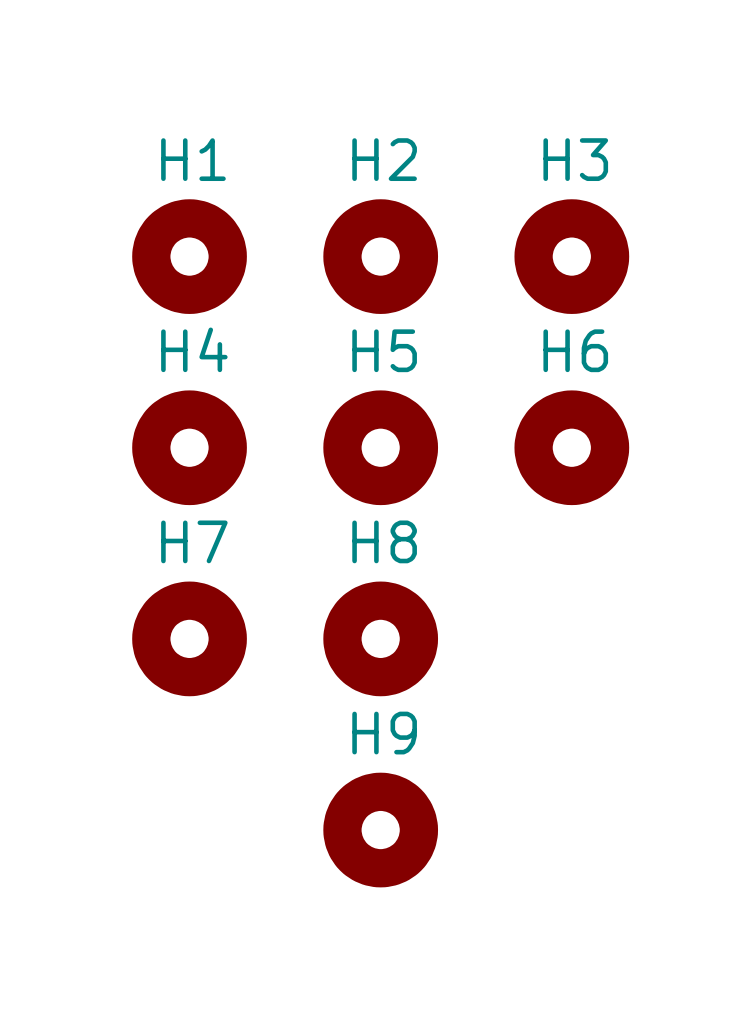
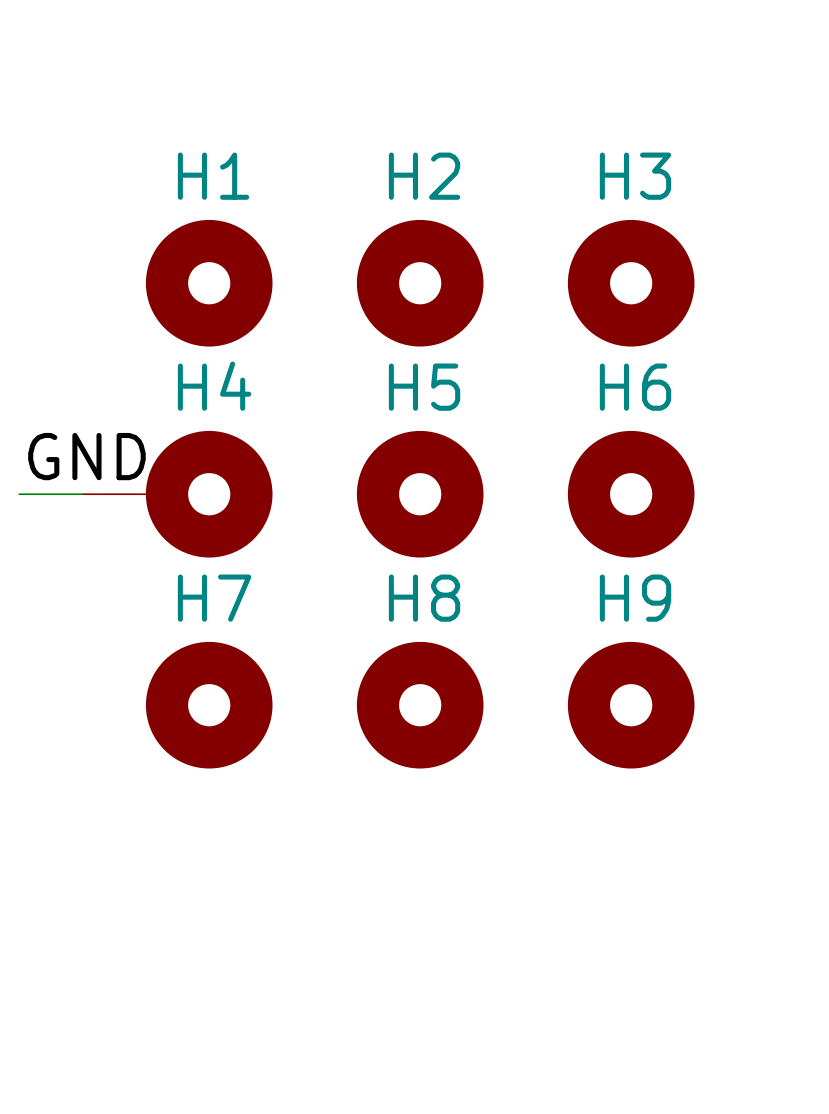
H4 symbol: [132, 390, 247, 506] -> [82, 430, 273, 558]
label: none -> GND (86, 456)
wire: none -> (19, 494) (82, 494)
H9 position: (380, 830) -> (631, 705)

